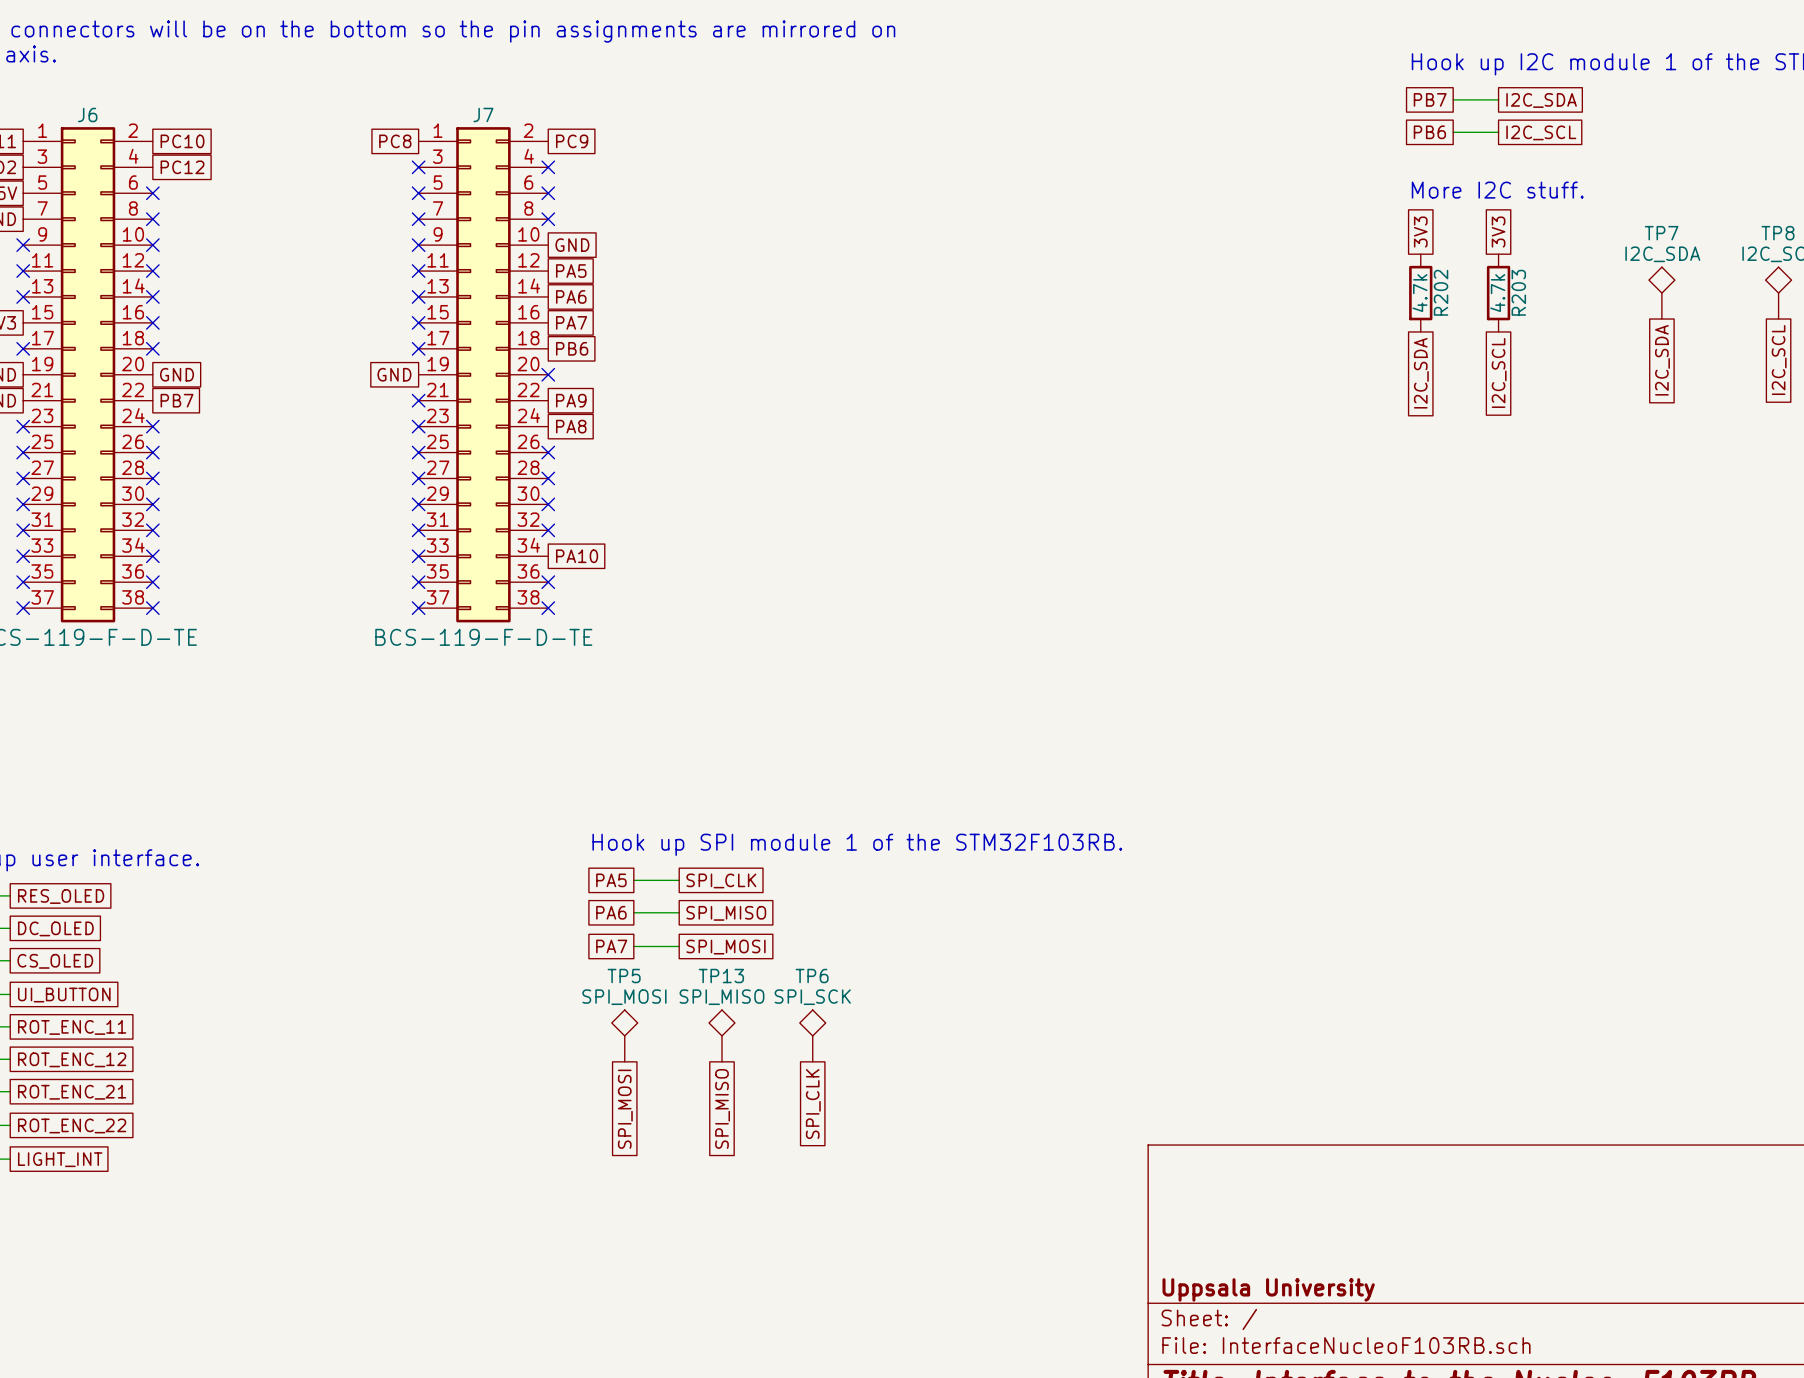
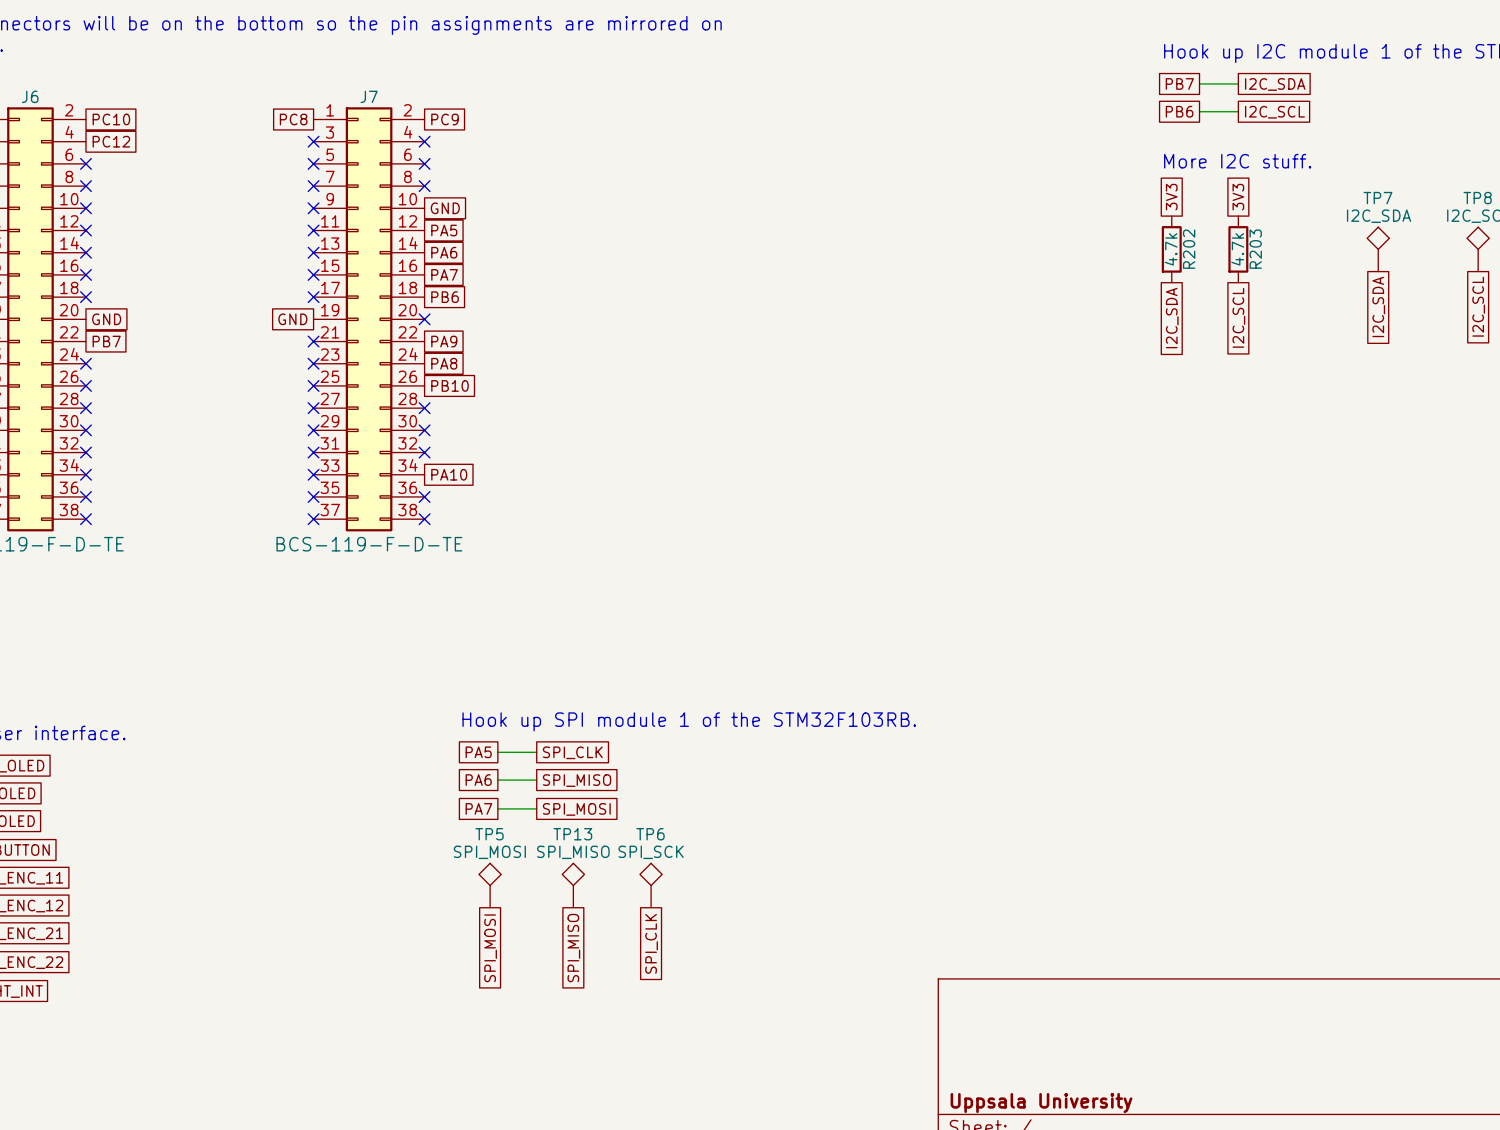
no-connect mark: (548, 452) -> none
global label: none -> PB10 (450, 385)

